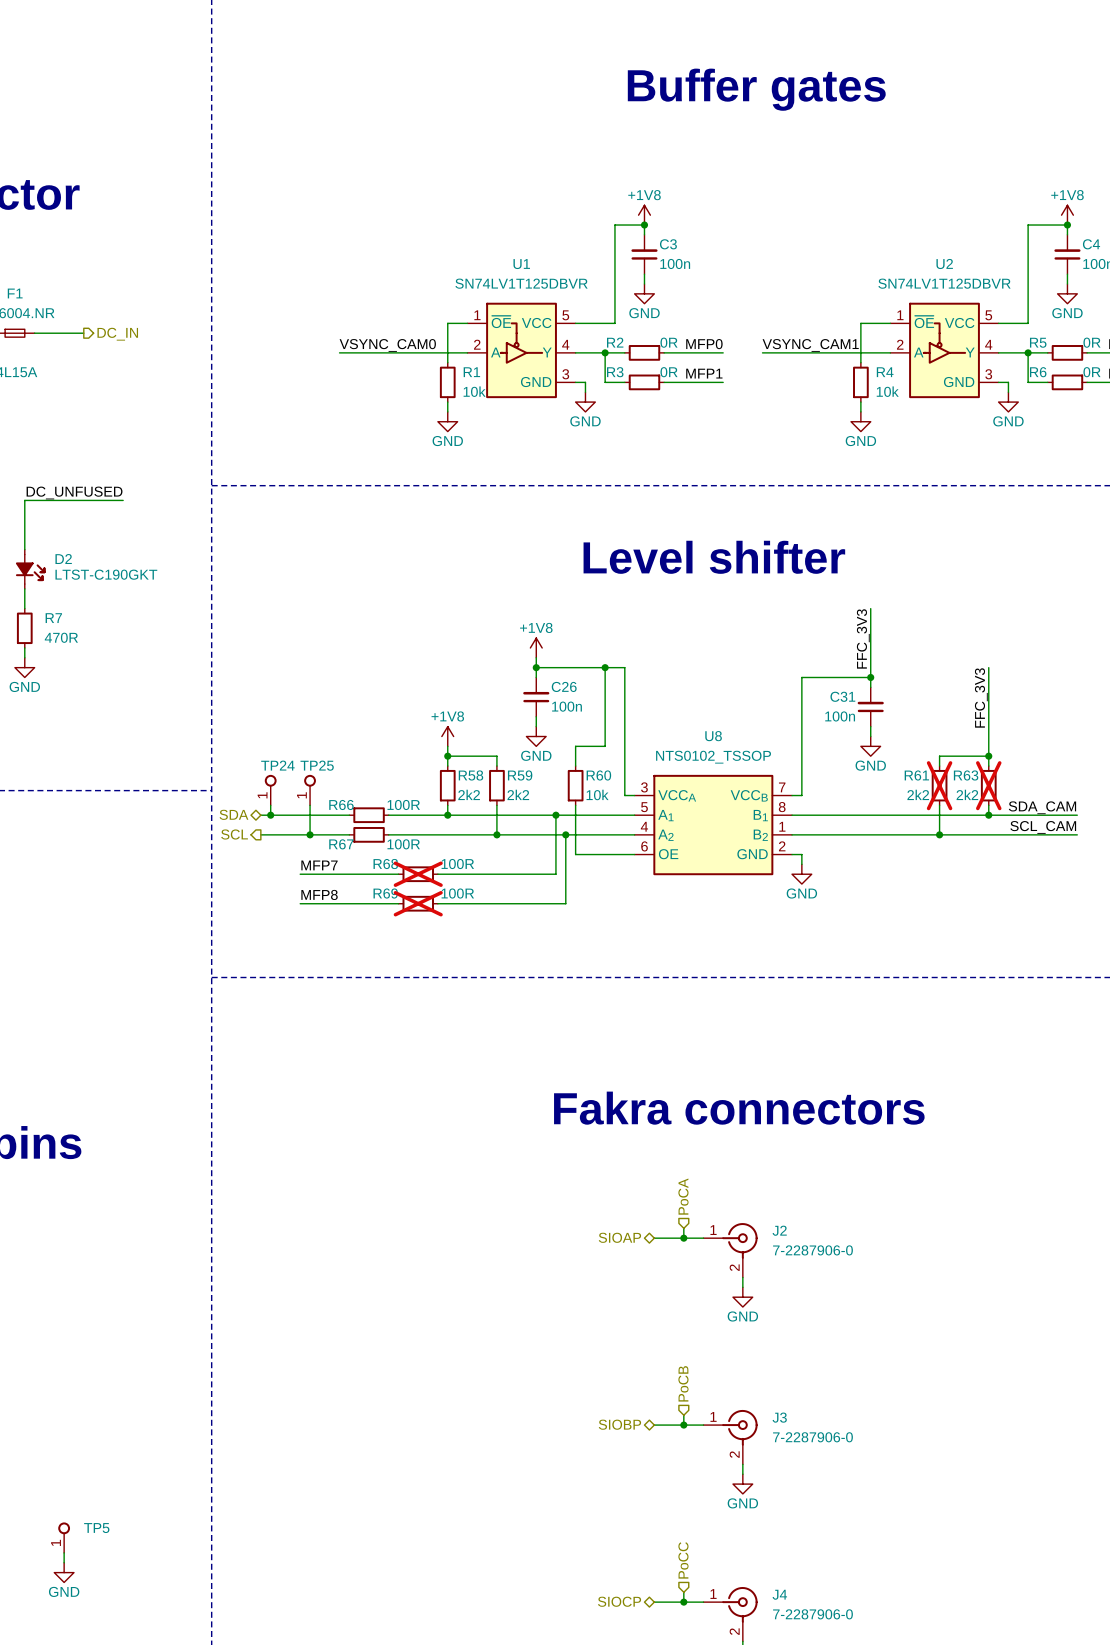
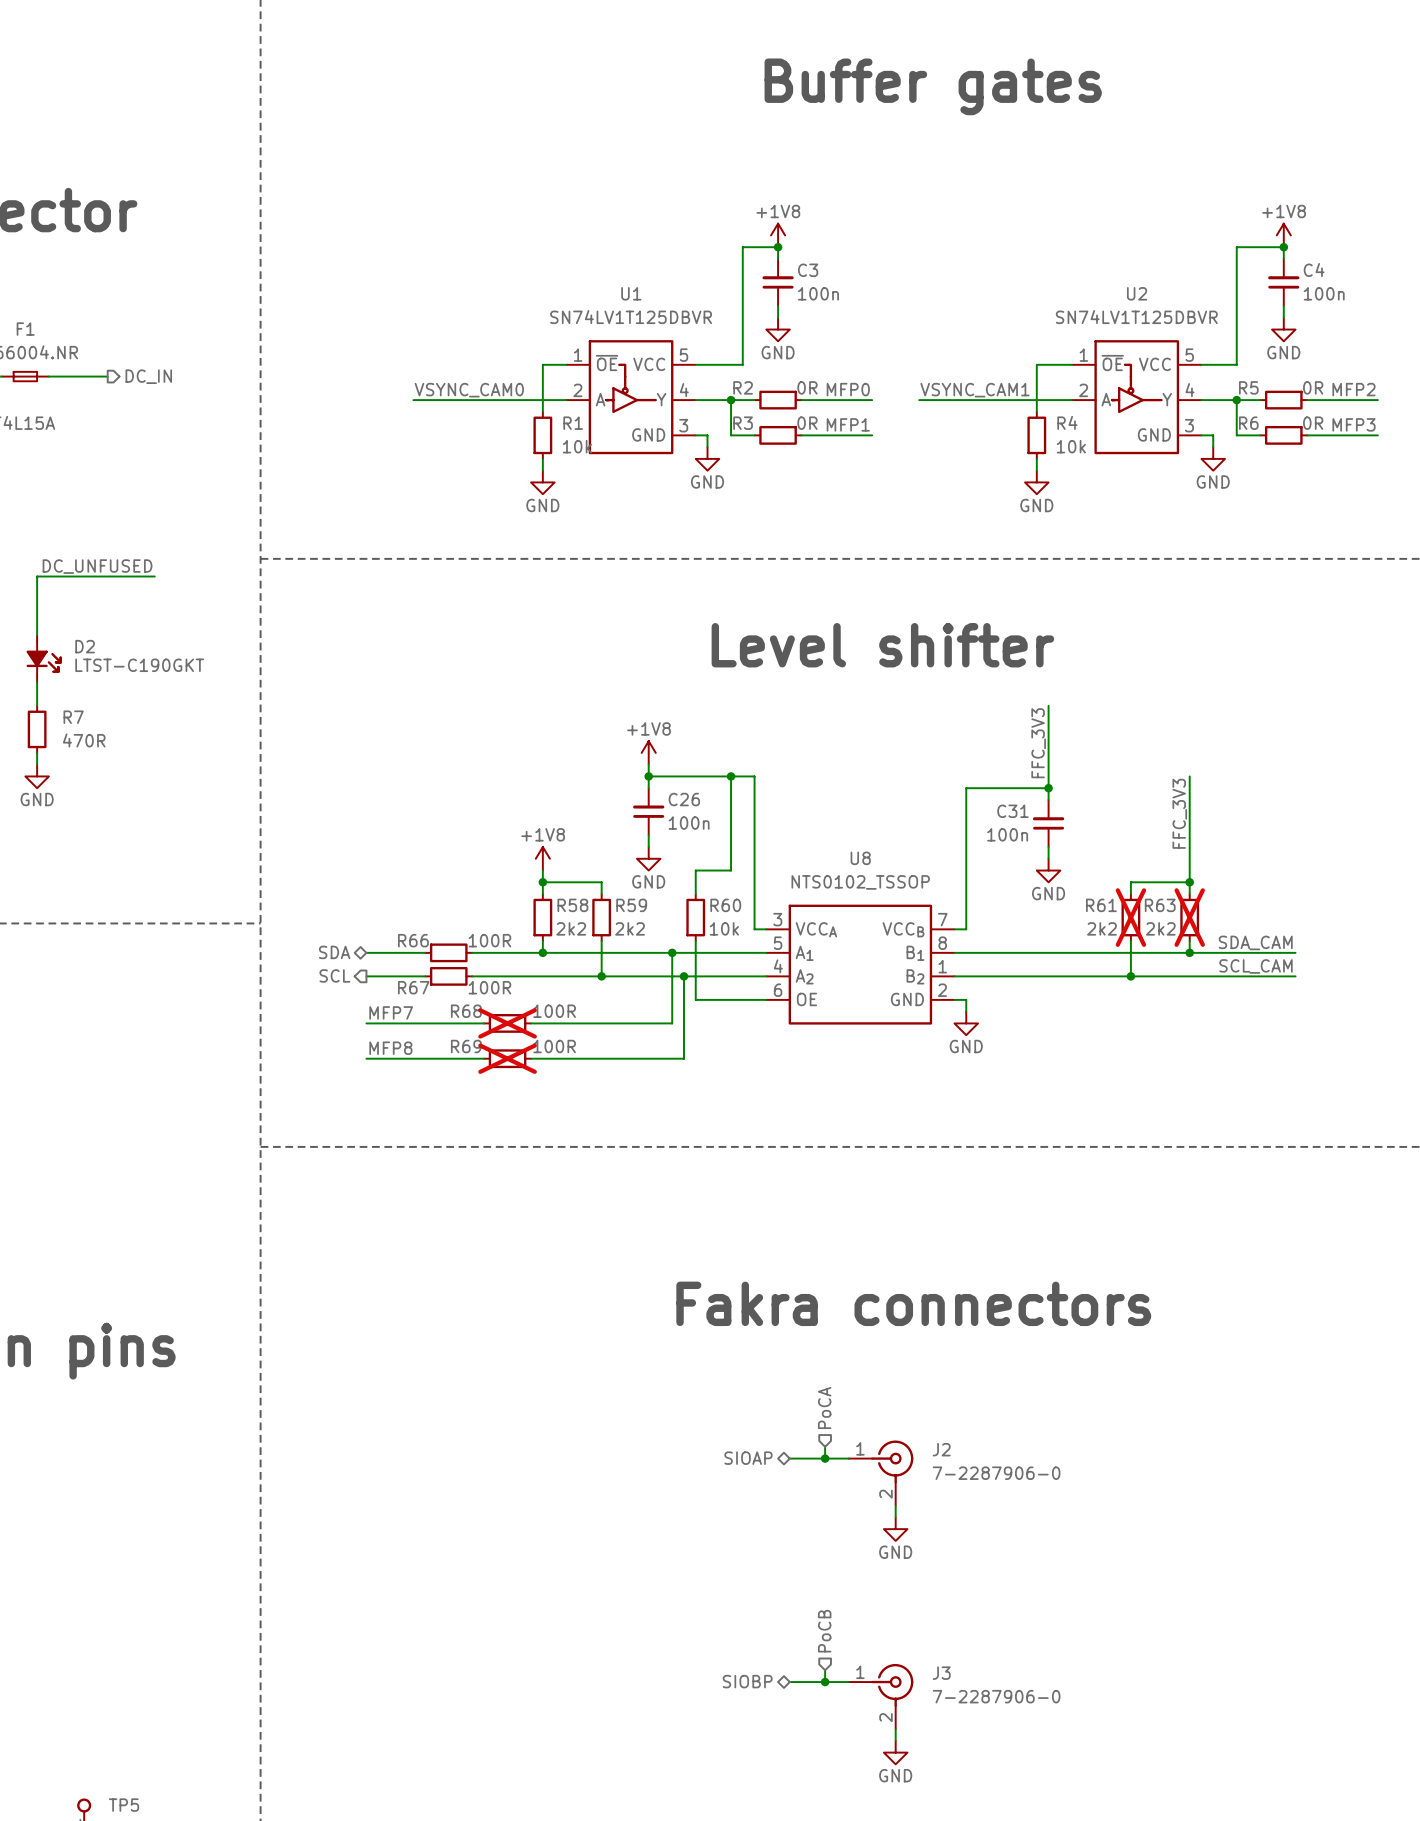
TP24: (270, 790) -> none
TP25: (310, 790) -> none
wire: (270, 805) (270, 815) -> none
wire: (310, 805) (310, 834) -> none
hierarchical label position: SDA (233, 814) -> SDA (334, 952)
wire: (260, 815) (300, 815) -> none
junction: (270, 815) -> none
hierarchical label position: SCL (234, 834) -> SCL (334, 975)
wire: (260, 834) (300, 834) -> none
junction: (310, 834) -> none

